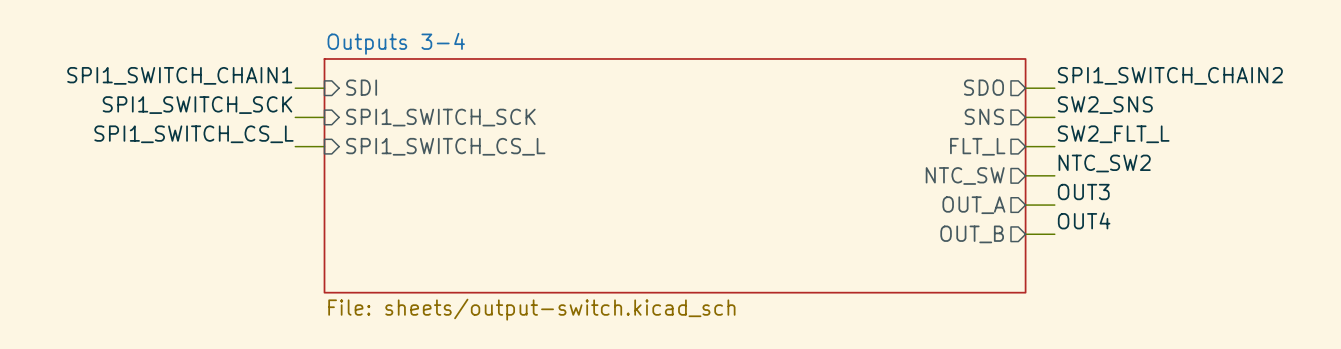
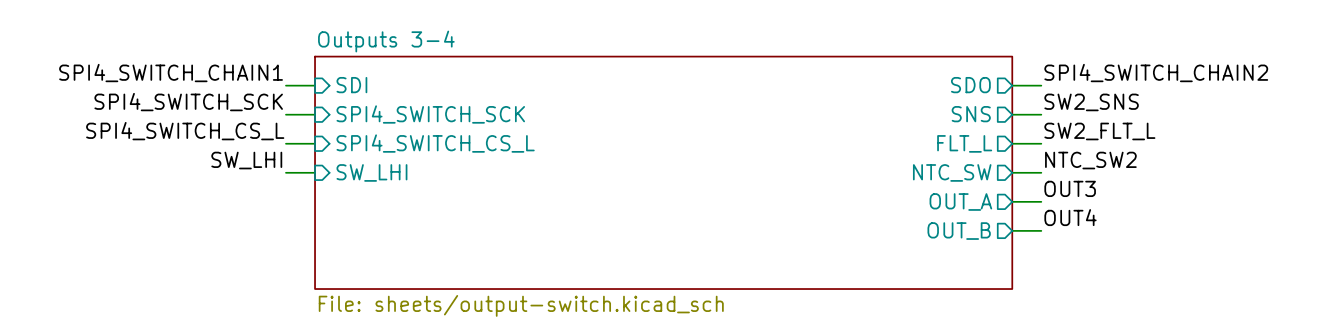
label: SPI1_SWITCH_CHAIN1 (179, 75) -> SPI4_SWITCH_CHAIN1 (171, 73)
label: SPI1_SWITCH_CHAIN2 (1170, 75) -> SPI4_SWITCH_CHAIN2 (1156, 73)
label: SPI1_SWITCH_SCK (197, 105) -> SPI4_SWITCH_SCK (188, 102)
sheet pin: SPI1_SWITCH_SCK (440, 117) -> SPI4_SWITCH_SCK (430, 114)
label: SPI1_SWITCH_CS_L (193, 134) -> SPI4_SWITCH_CS_L (185, 131)
sheet pin: SPI1_SWITCH_CS_L (445, 146) -> SPI4_SWITCH_CS_L (435, 143)
label: none -> SW_LHI (246, 160)
wire: none -> (285, 172) (315, 172)
sheet pin: none -> SW_LHI (371, 172)

